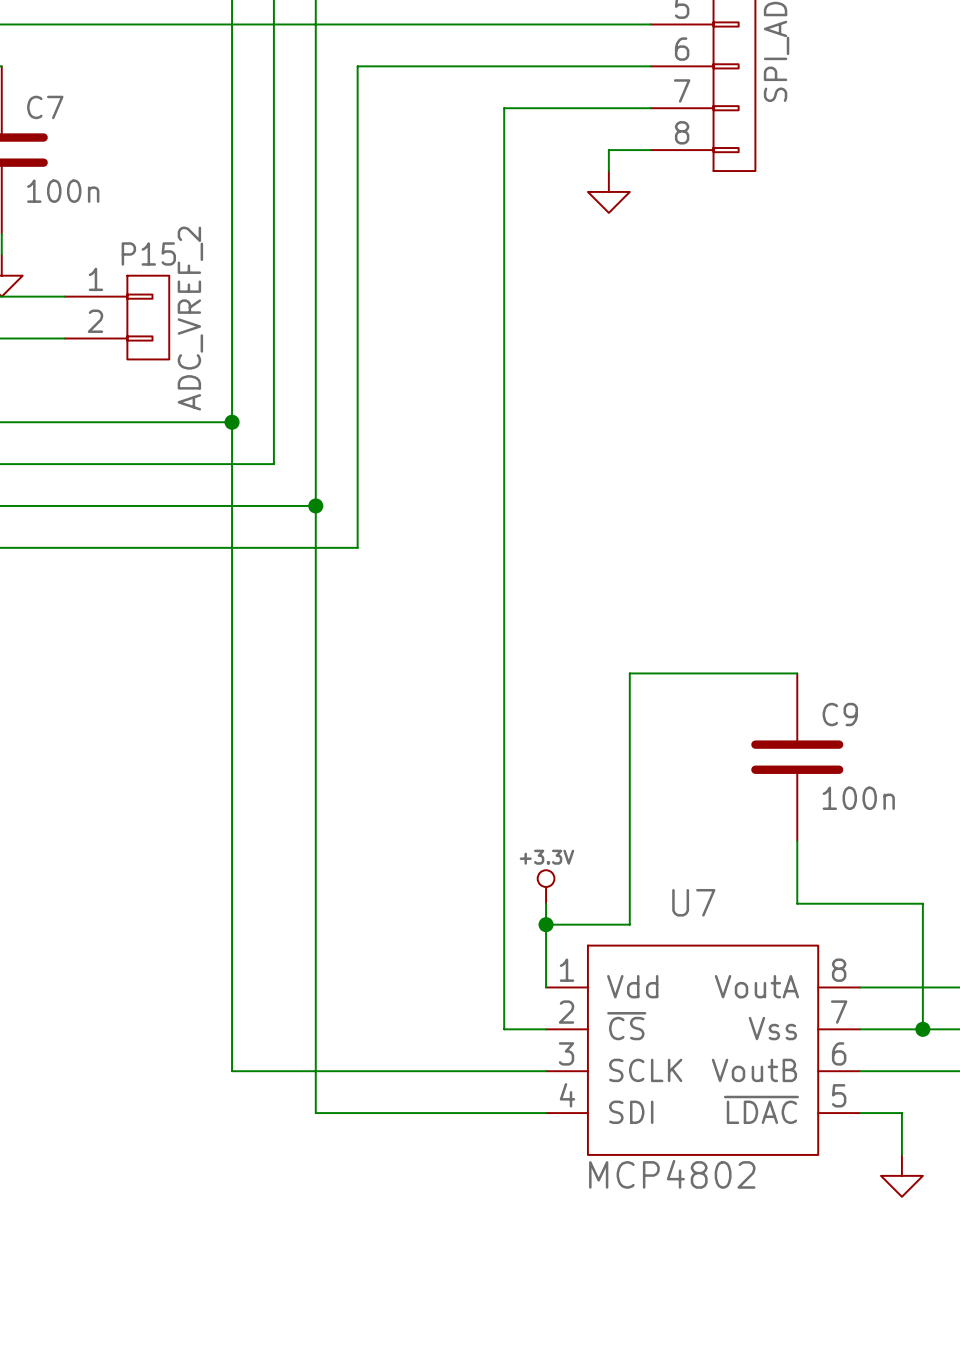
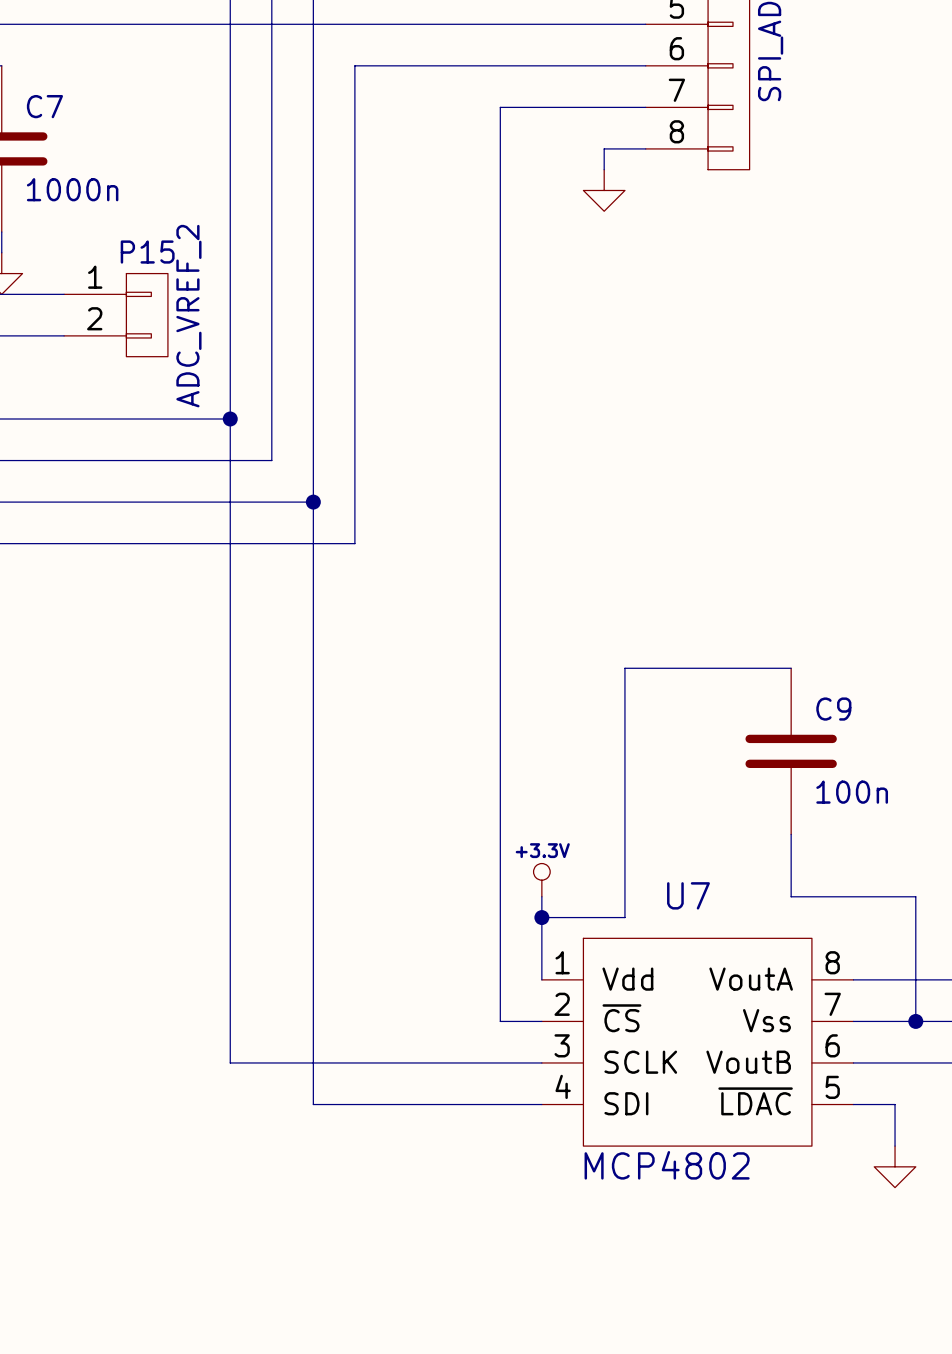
C7 value: 100n (63, 191) -> 1000n (72, 189)

